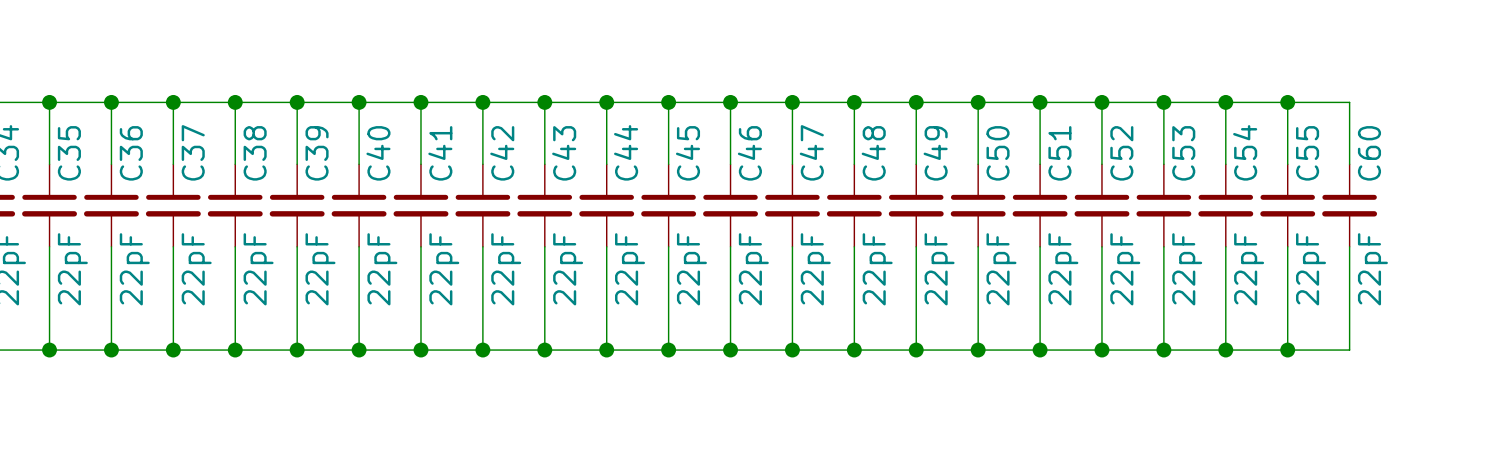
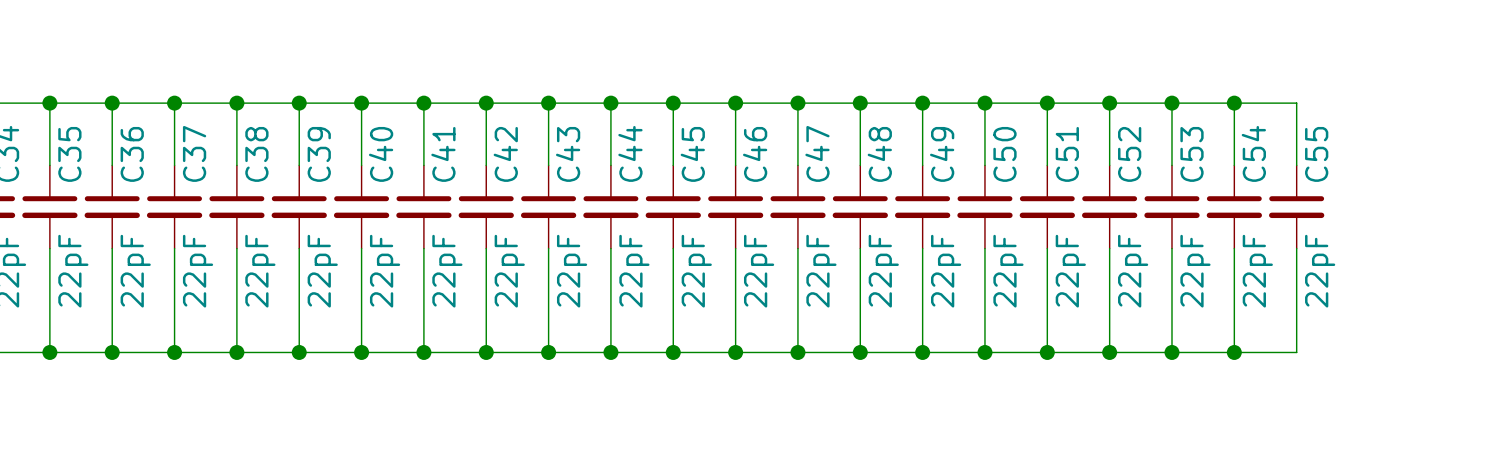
wire: (1287, 102) (1349, 102) (1349, 164) -> none
junction: (1287, 102) -> none
C60: 22pF (1349, 205) -> none
wire: (1349, 246) (1349, 350) (1287, 350) -> none
junction: (1287, 350) -> none

